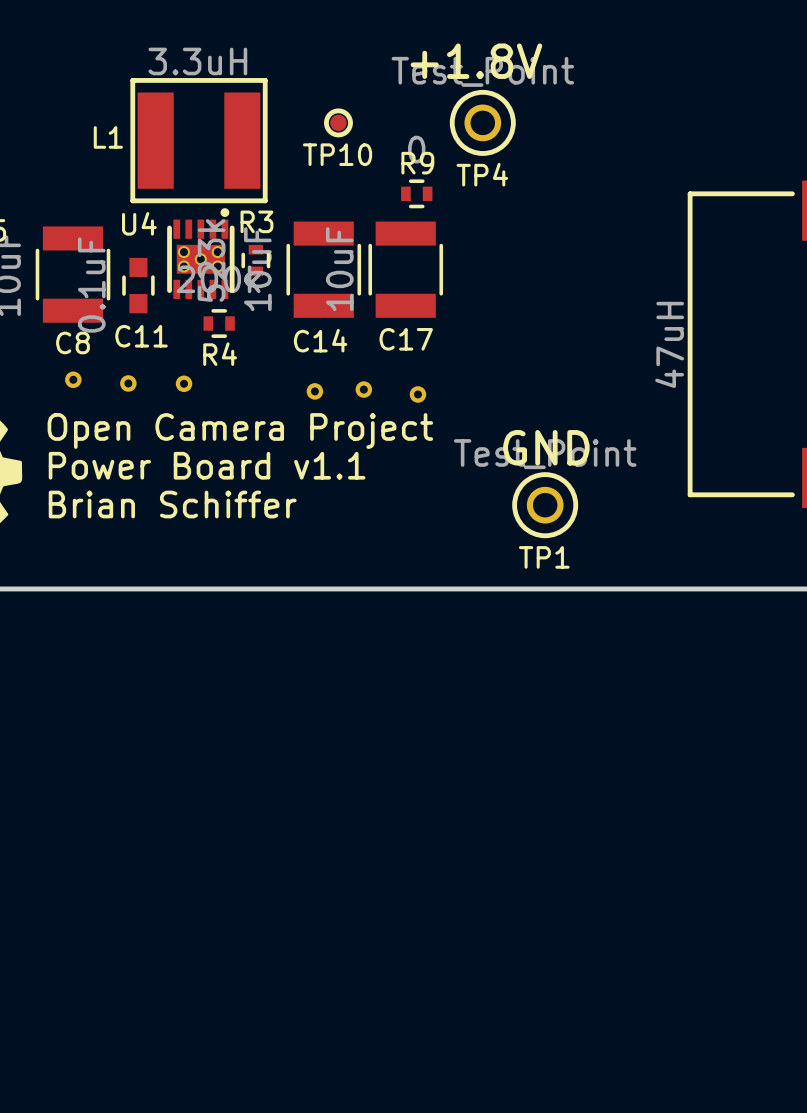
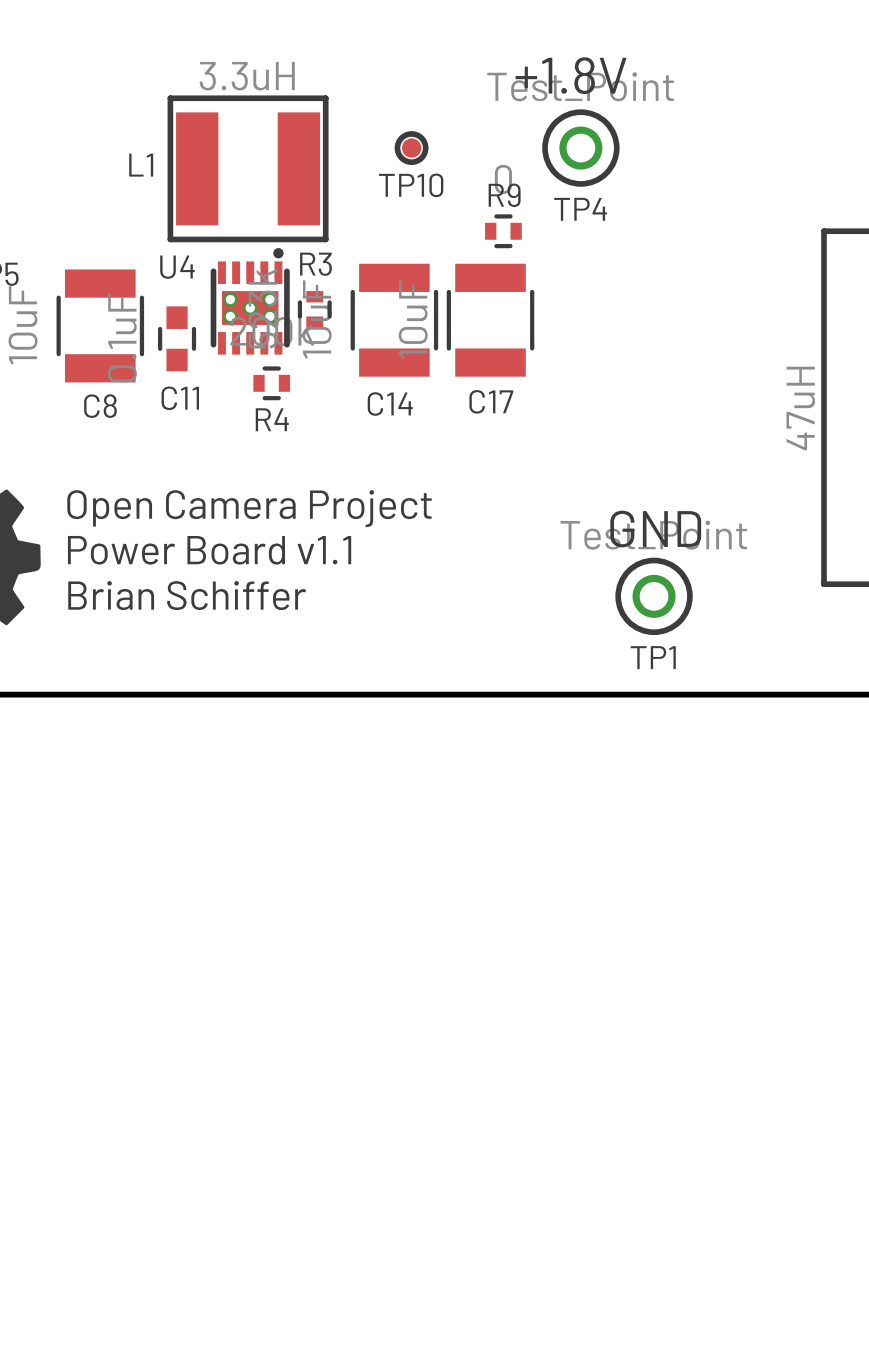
part: (73, 379) -> none
part: (128, 383) -> none
part: (184, 383) -> none
part: (363, 389) -> none
part: (314, 391) -> none
part: (417, 394) -> none

